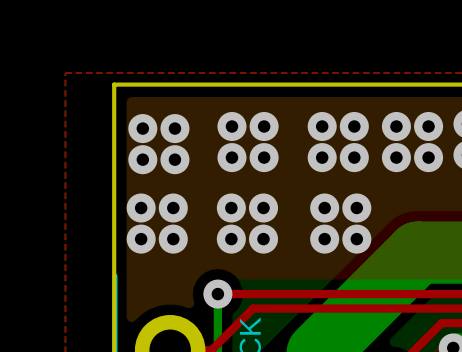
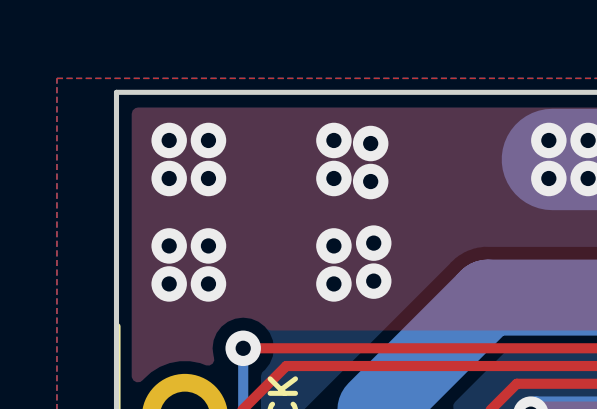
via: none -> (169, 140)
via: none -> (208, 140)
via: none -> (333, 140)
via: (231, 126) -> none
via: (264, 126) -> none
via: (354, 126) -> none
via: (396, 126) -> none
via: (428, 126) -> none
via: (142, 128) -> none
via: (174, 128) -> none
via: none -> (169, 178)
via: none -> (208, 178)
via: none -> (333, 178)
via: (231, 157) -> none
via: (264, 157) -> none
via: (354, 157) -> none
via: (396, 157) -> none
via: (428, 157) -> none
via: (142, 159) -> none
via: (174, 159) -> none
via: (141, 208) -> none
via: (173, 208) -> none
via: (231, 208) -> none
via: (263, 208) -> none
via: (356, 208) -> none
via: none -> (169, 245)
via: none -> (208, 245)
via: none -> (333, 245)
via: (141, 239) -> none
via: (173, 239) -> none
via: (231, 239) -> none
via: (263, 239) -> none
via: (356, 239) -> none
via: none -> (169, 283)
via: none -> (208, 283)
via: none -> (333, 283)

